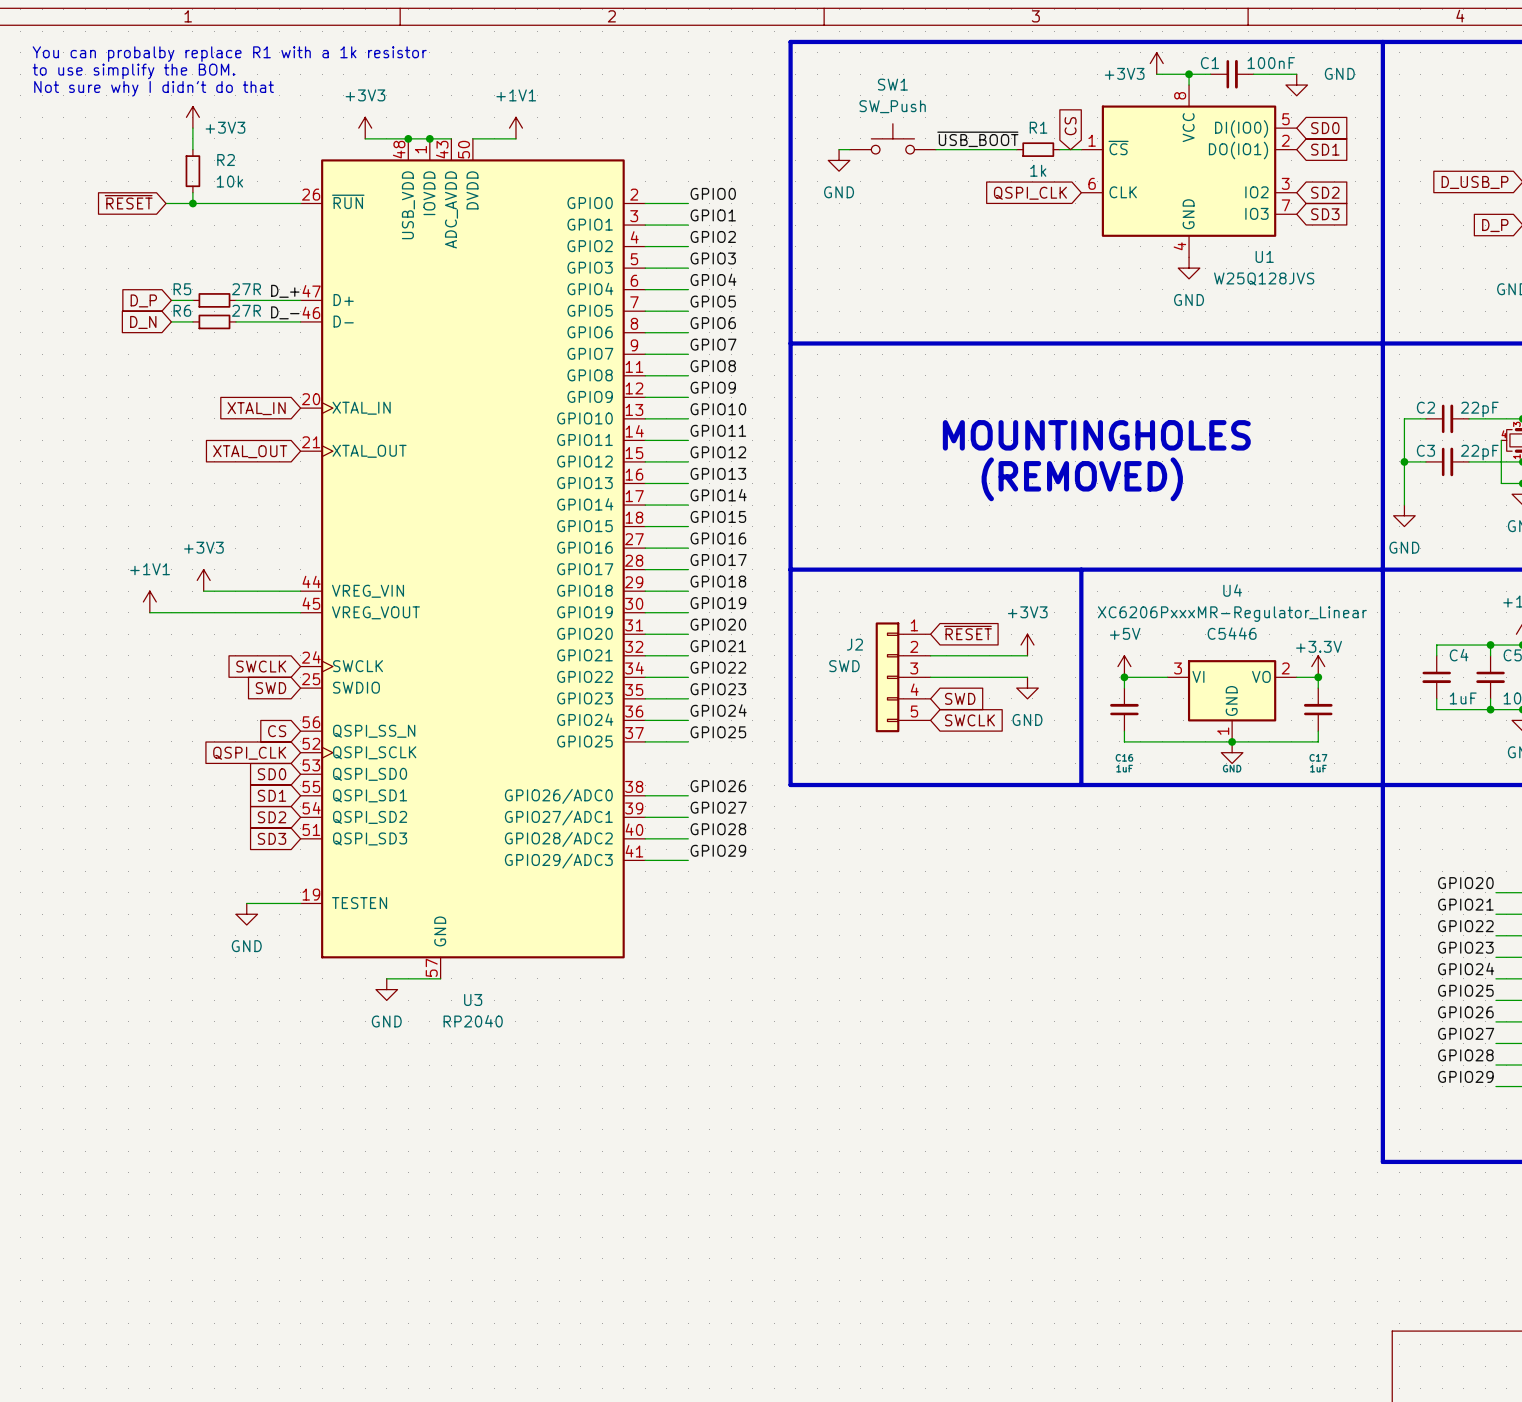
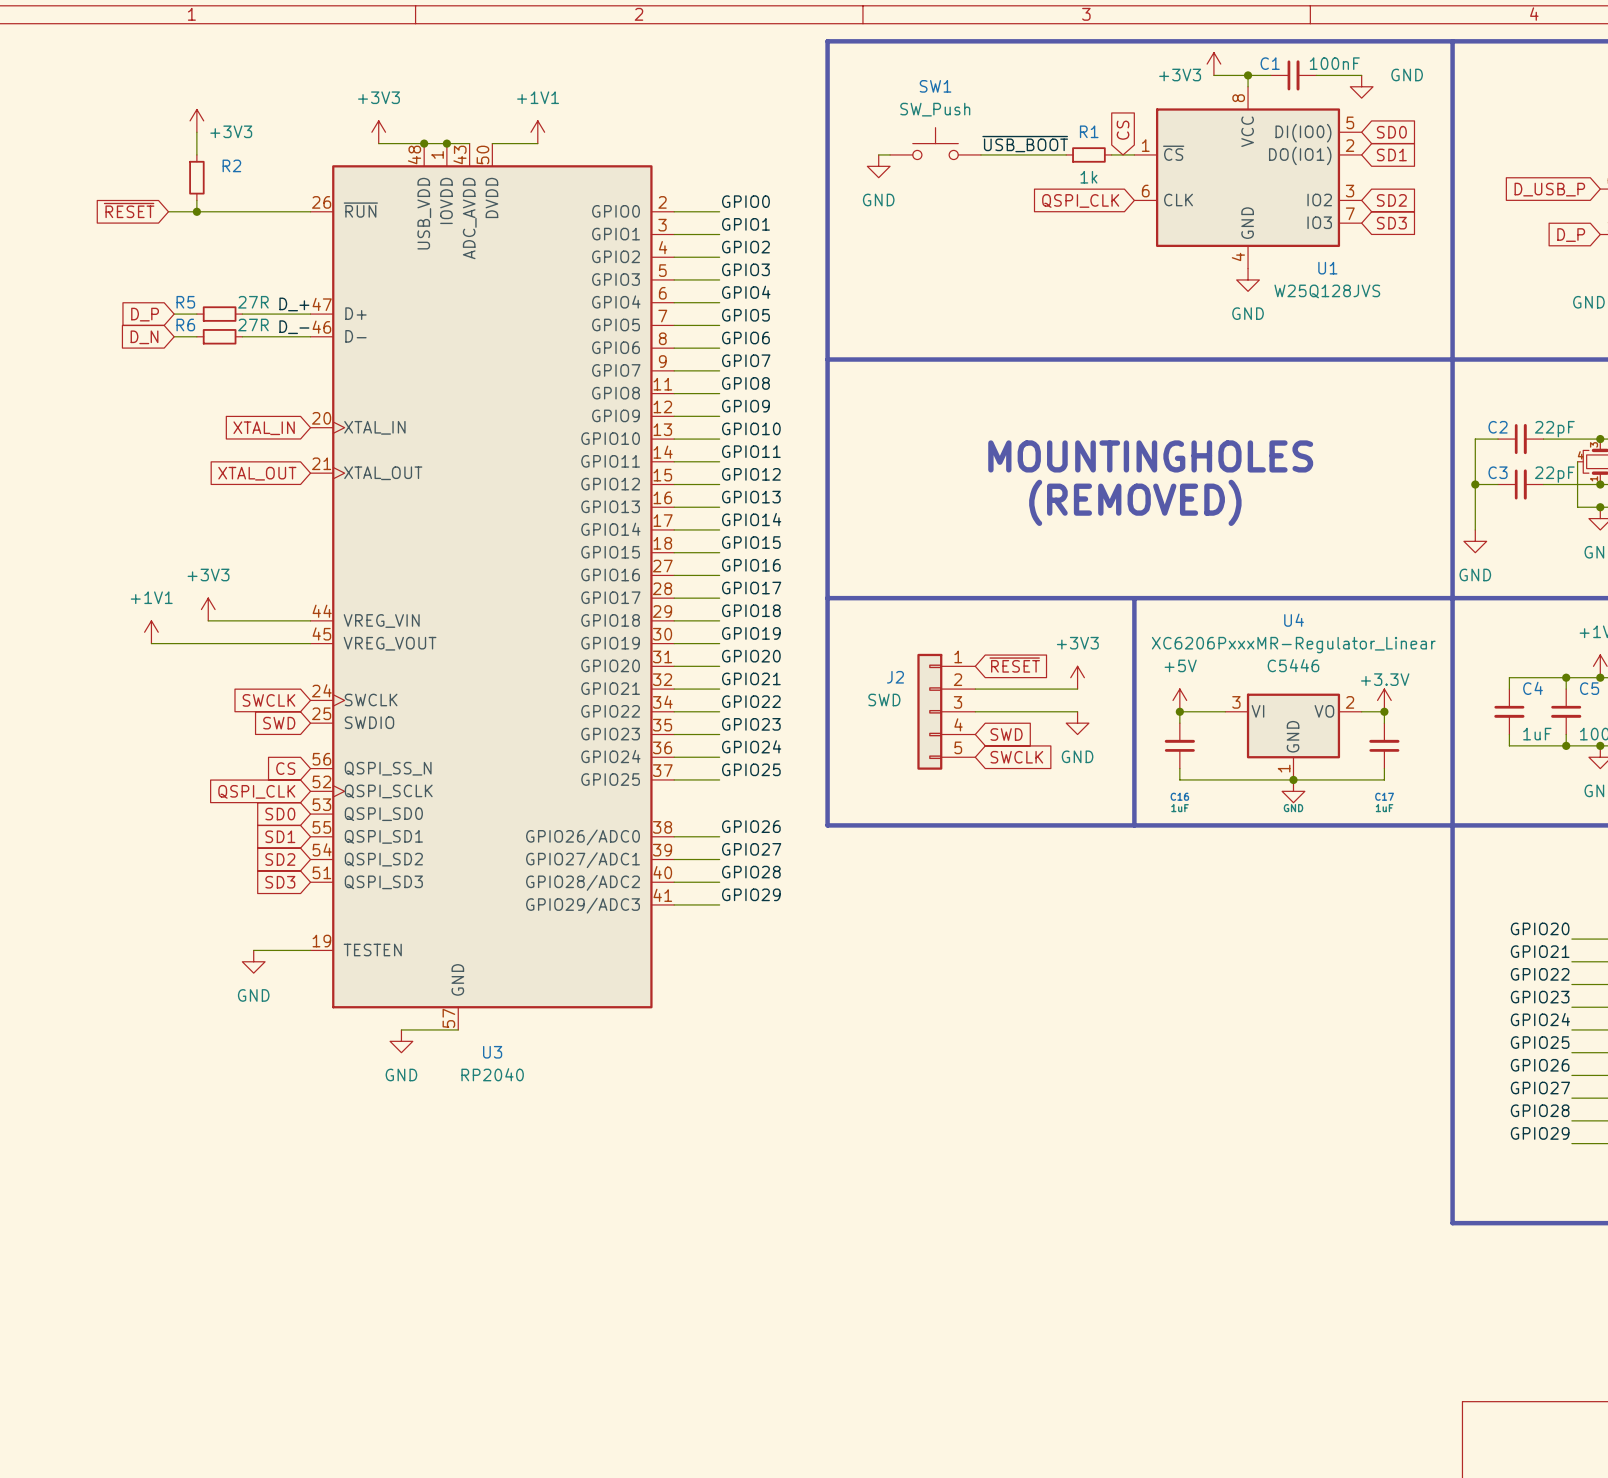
text: You can probalby replace R1 with a 1k resistor (229, 54) -> none
text: to use simplify the BOM. (133, 71) -> none
text: Not sure why I didn't do that (154, 88) -> none
R2 value: 10k (229, 181) -> none

